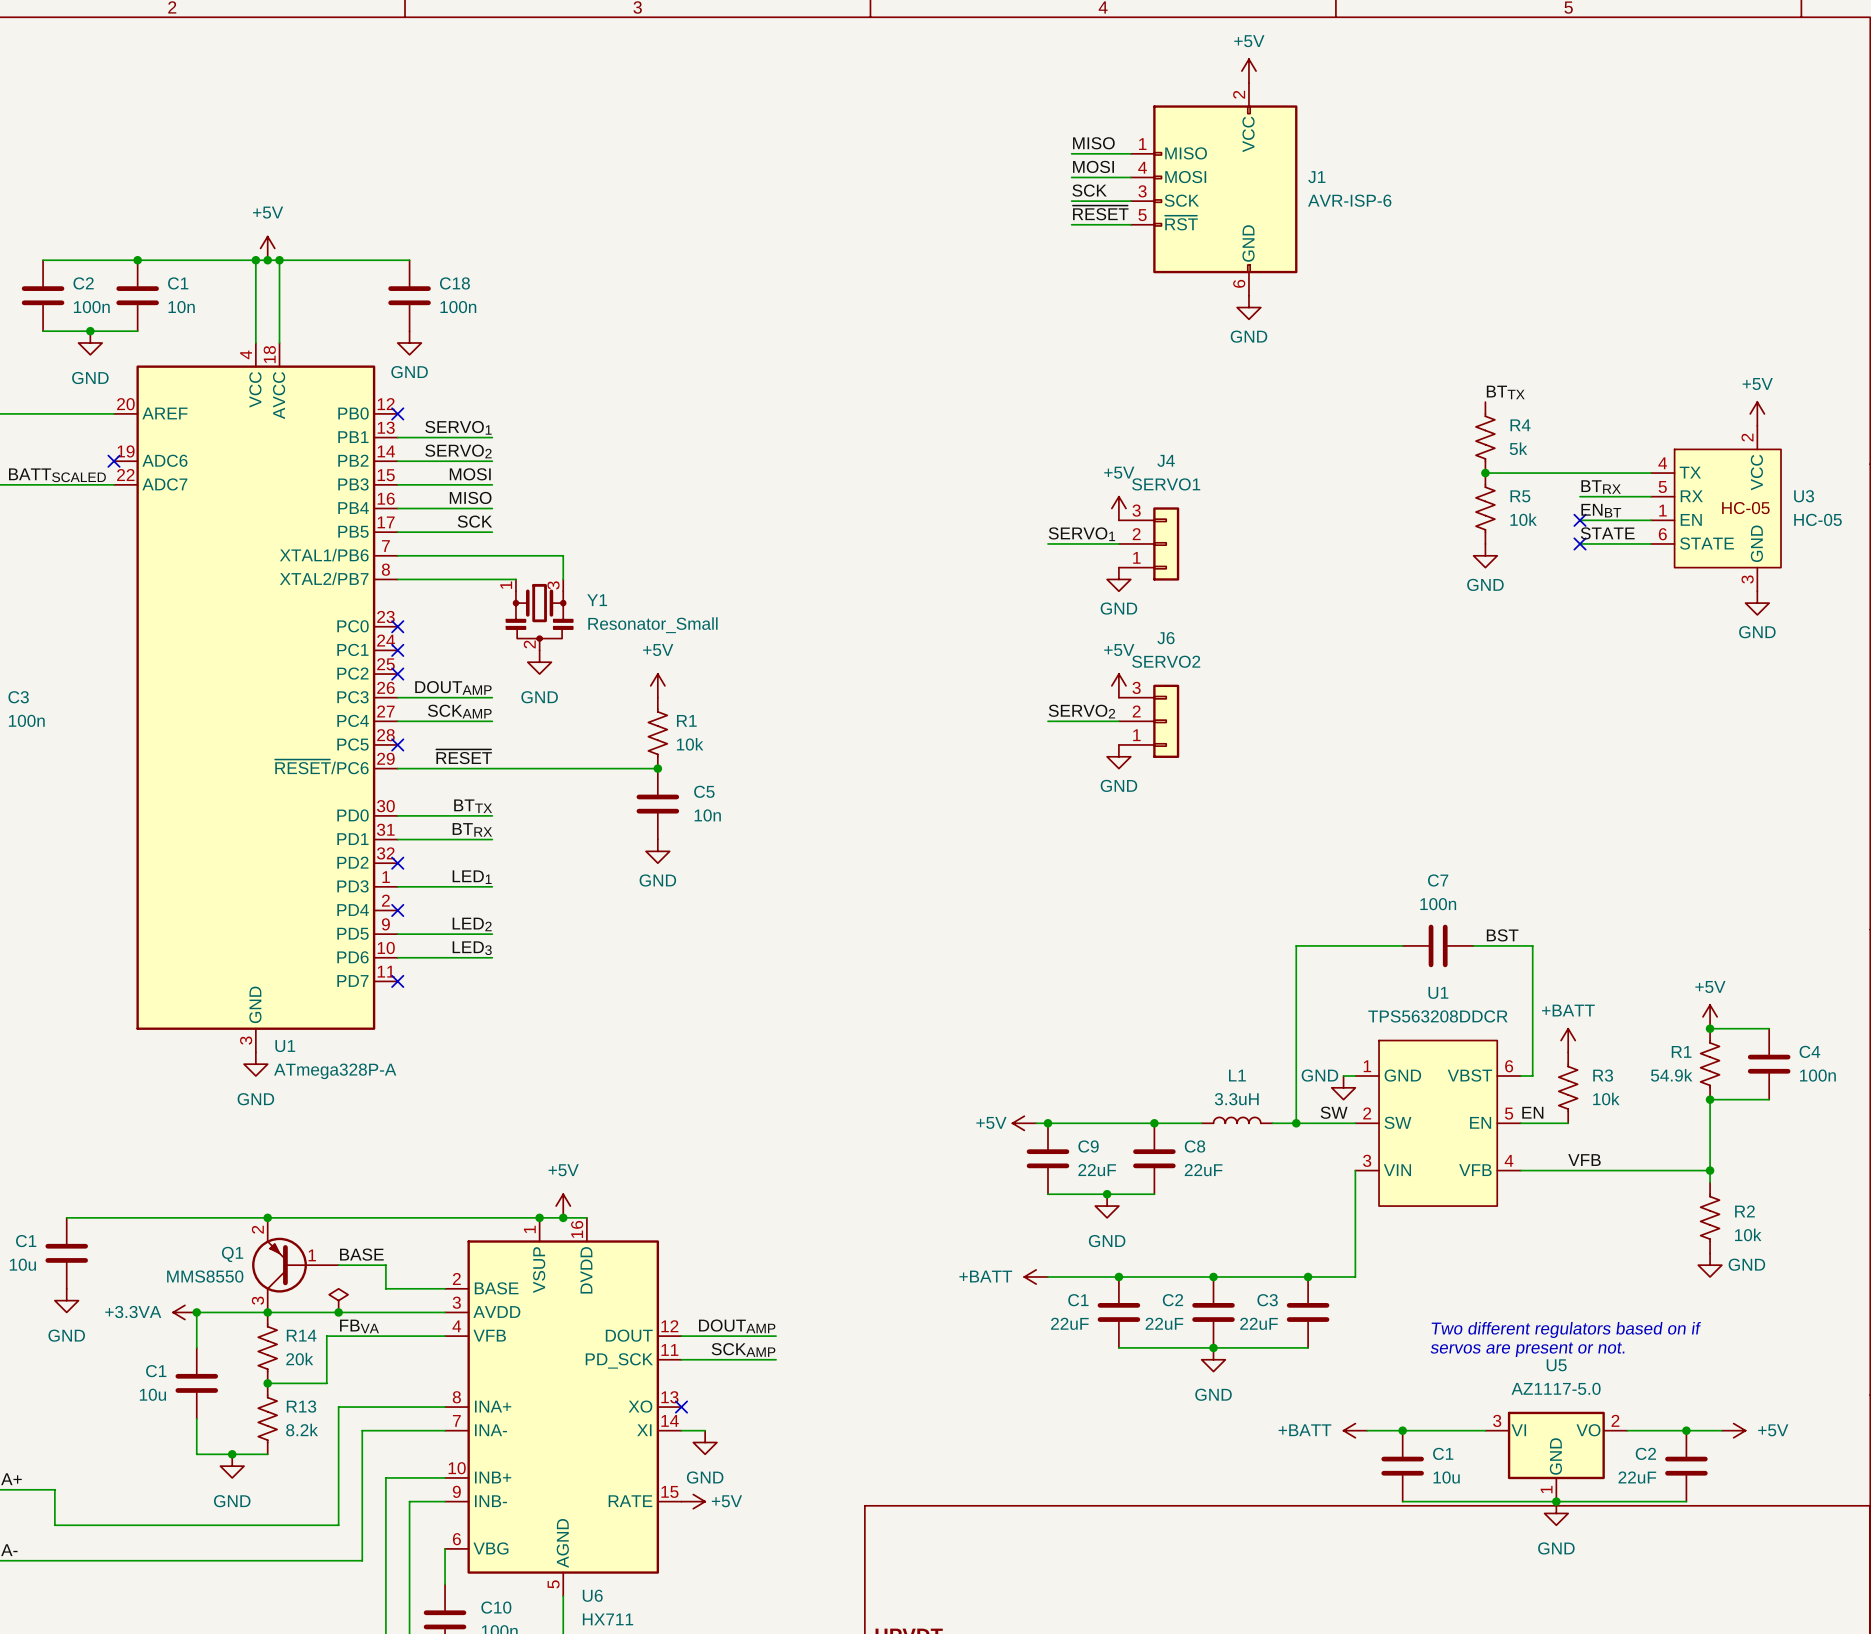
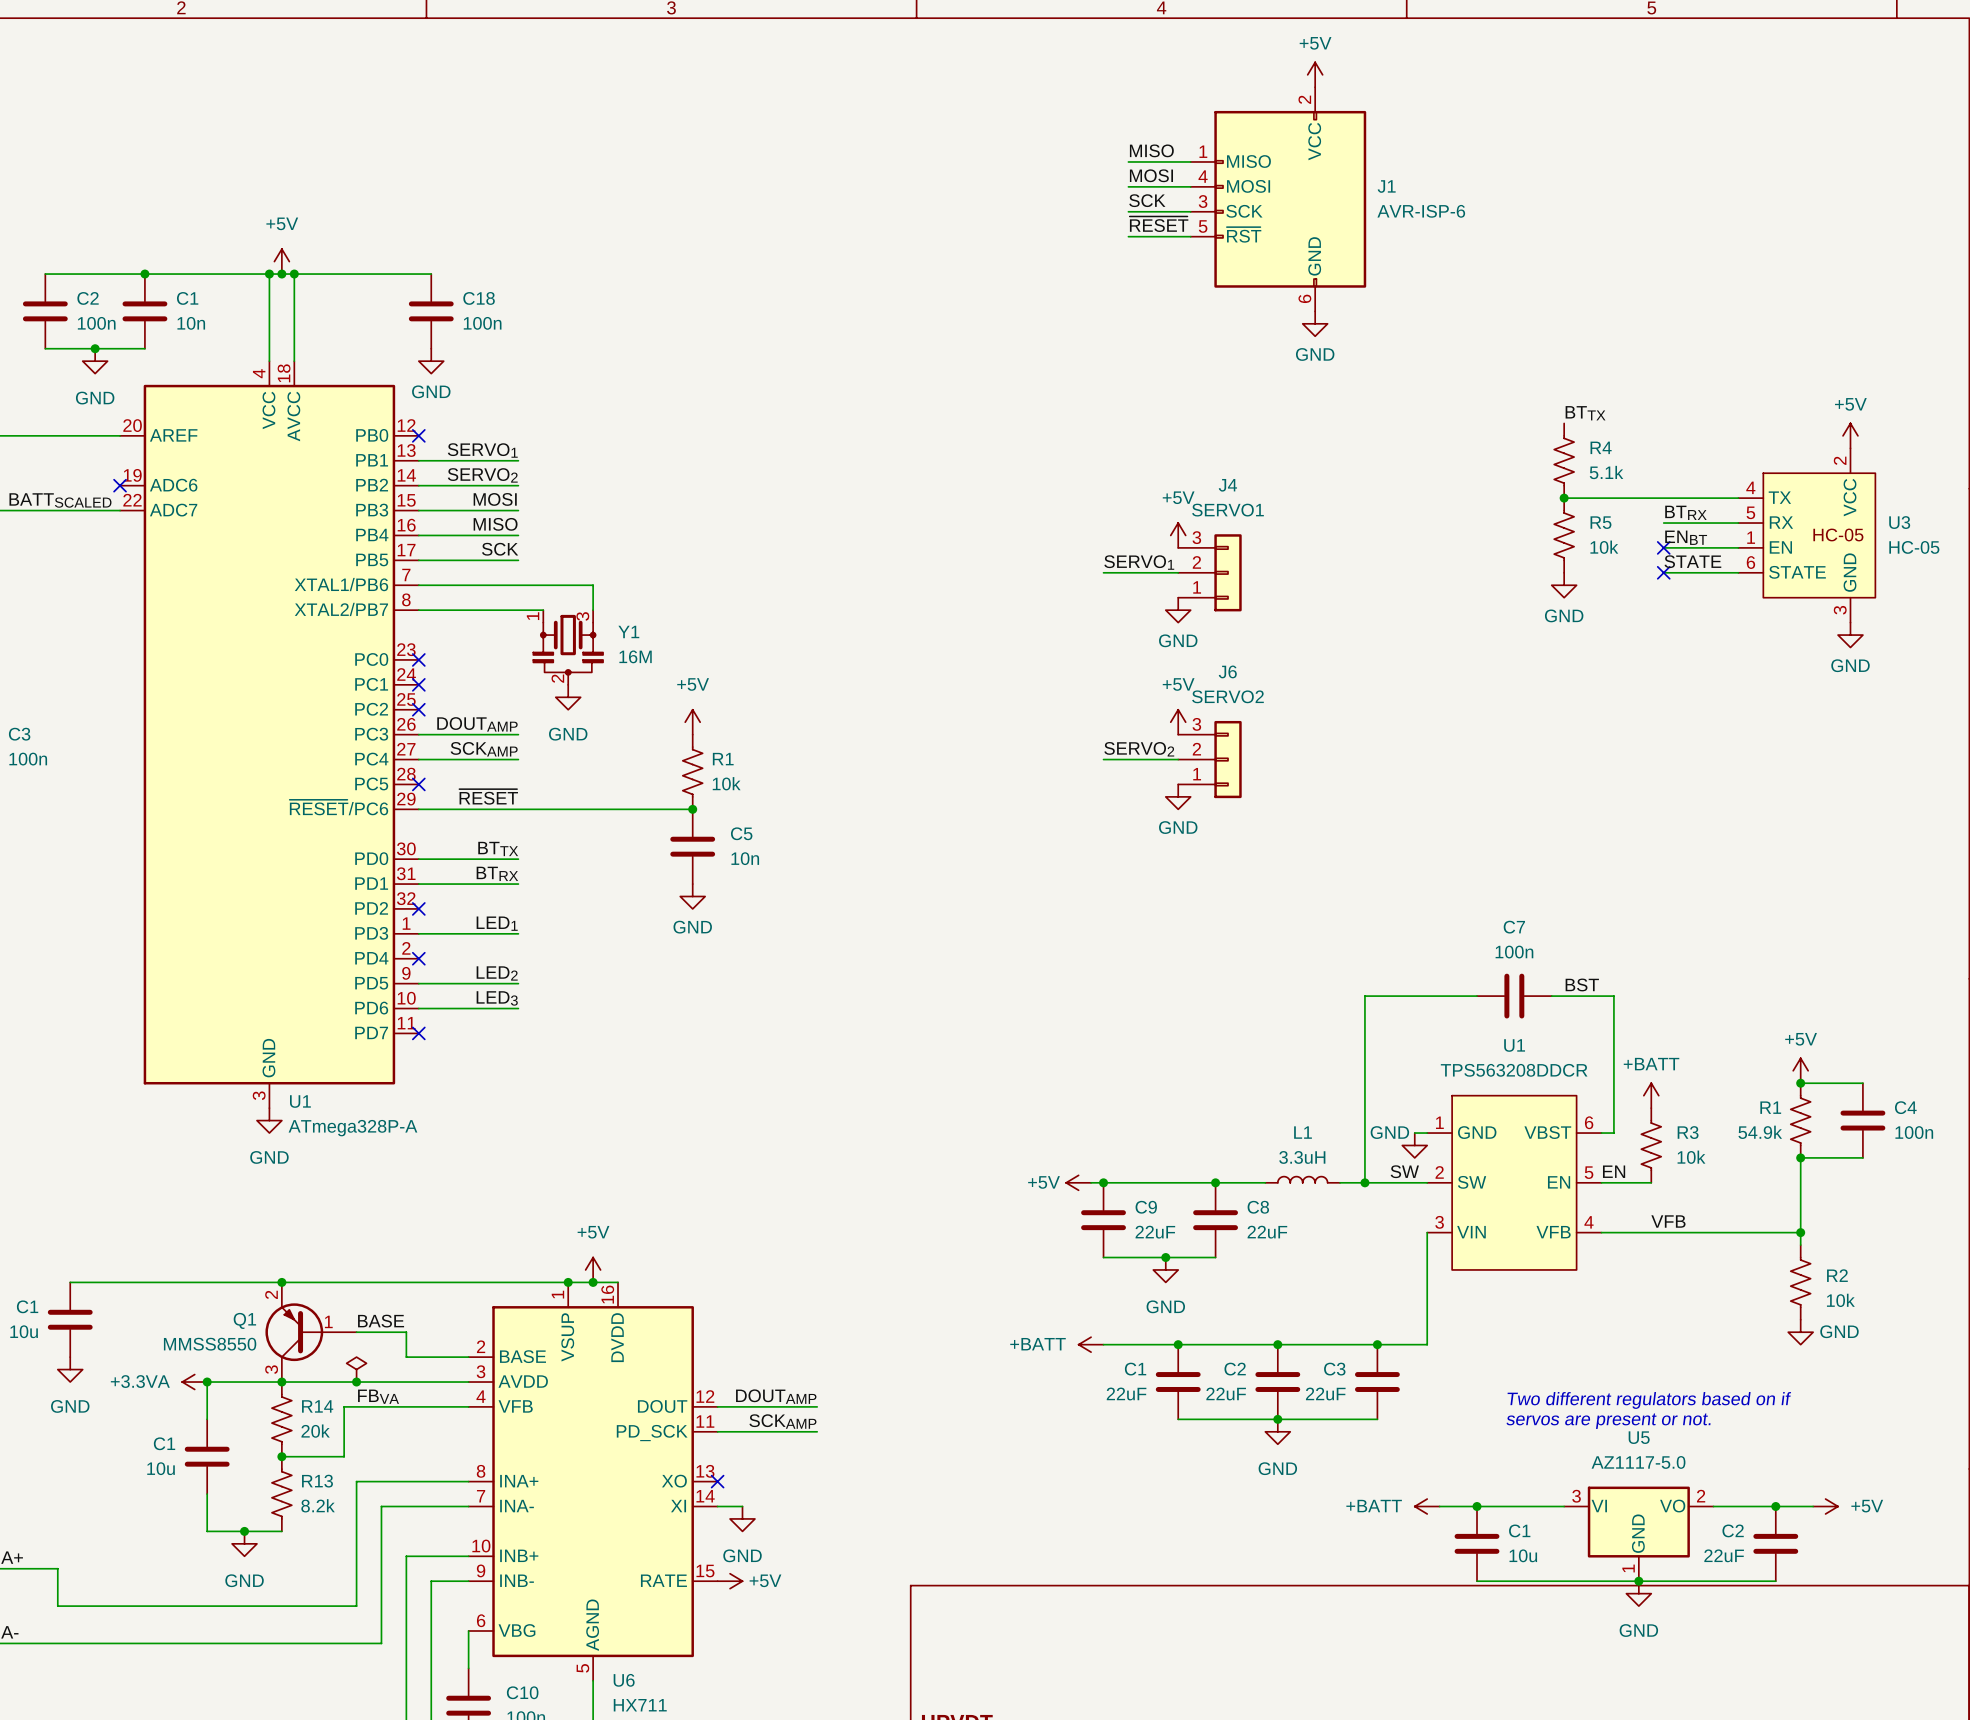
R4 value: 5k (1518, 448) -> 5.1k (1606, 472)
Y1 value: Resonator_Small (652, 625) -> 16M (635, 656)
Q1 value: MMS8550 (205, 1276) -> MMSS8550 (210, 1344)

